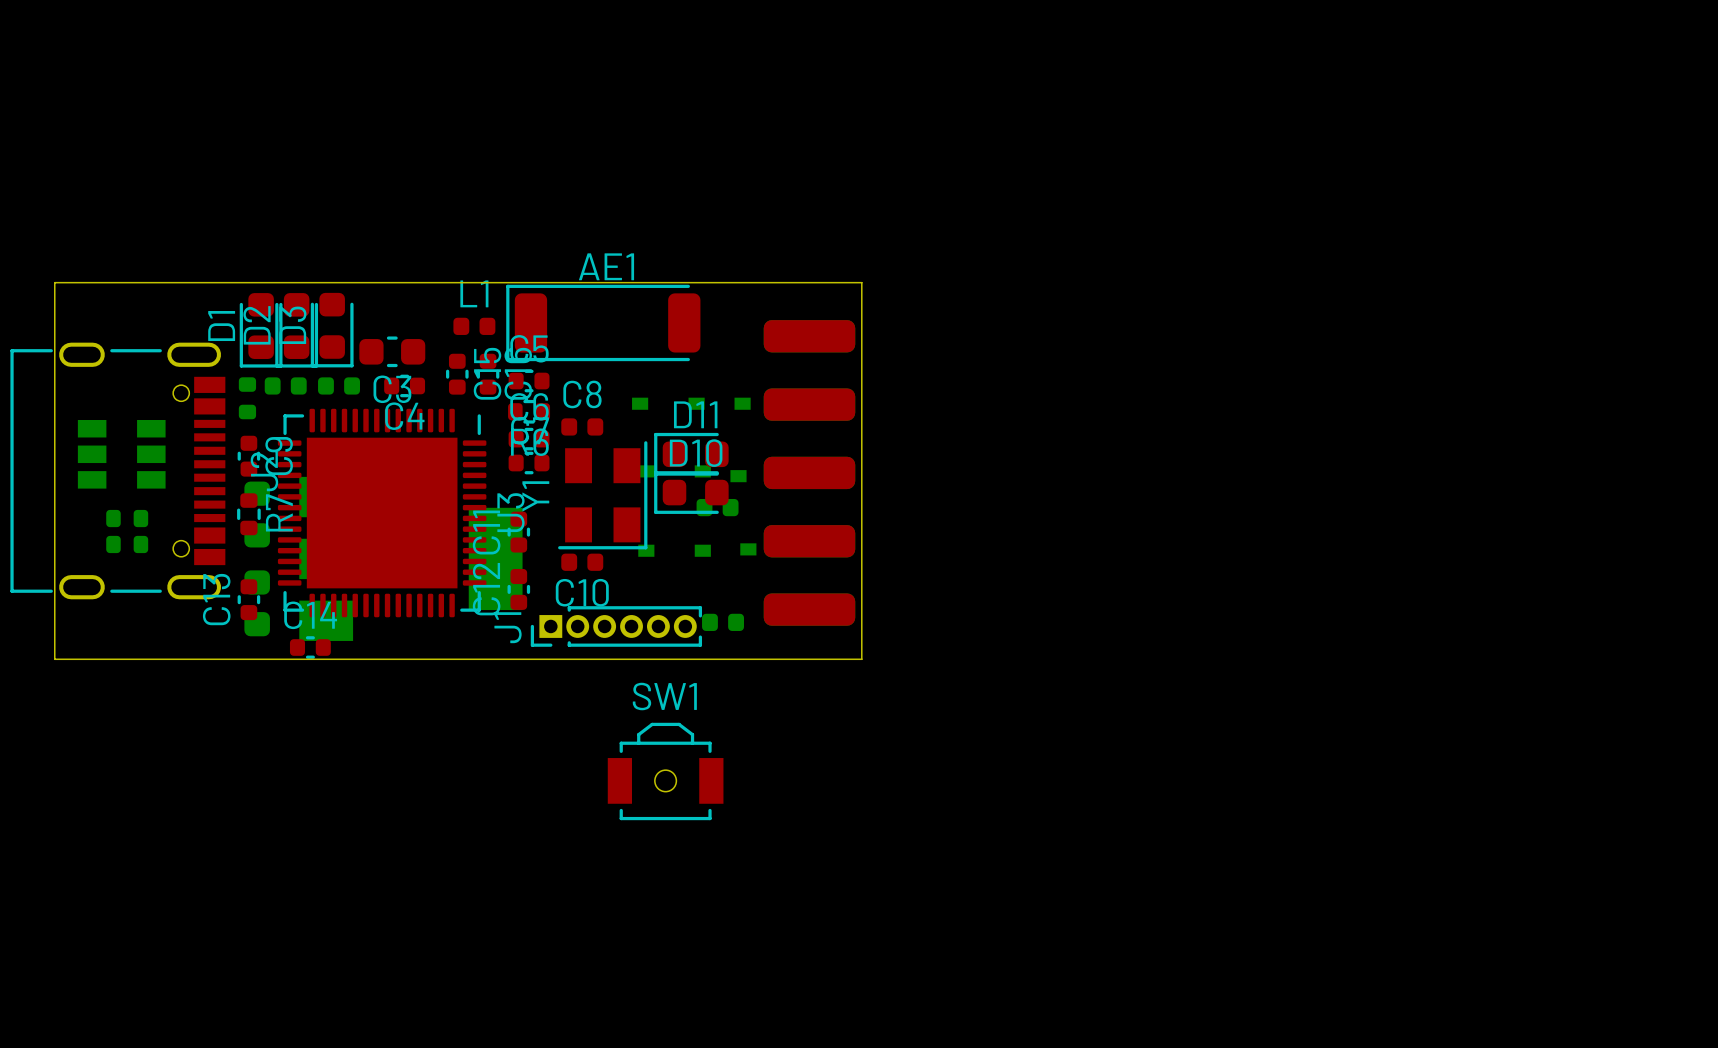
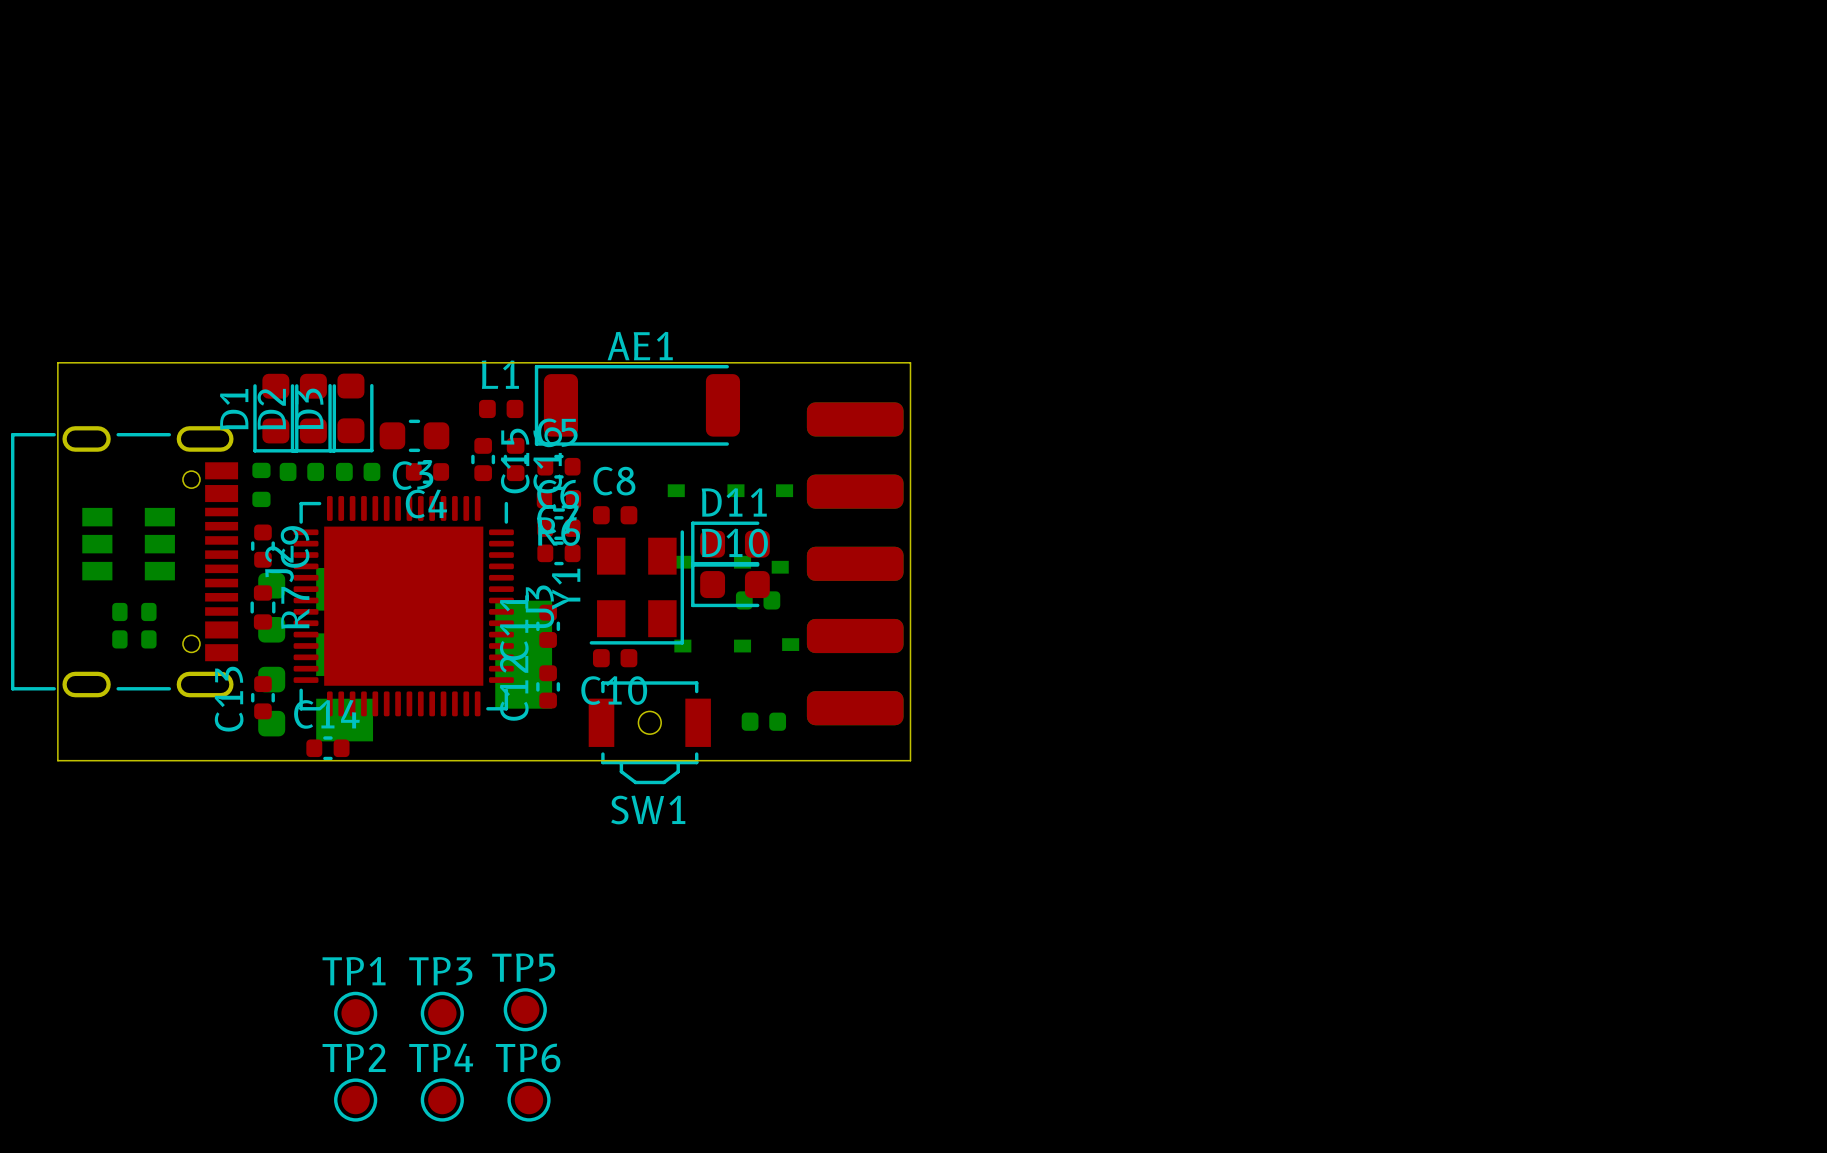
J1: (616, 626) -> none
SW1 rotation: 0° (665, 771) -> 180° (649, 732)
SW1 position: (665, 771) -> (649, 732)
TP5: none -> (525, 1009)
TP1: none -> (355, 1013)
TP3: none -> (442, 1013)
TP2: none -> (355, 1100)
TP4: none -> (442, 1100)
TP6: none -> (529, 1100)

